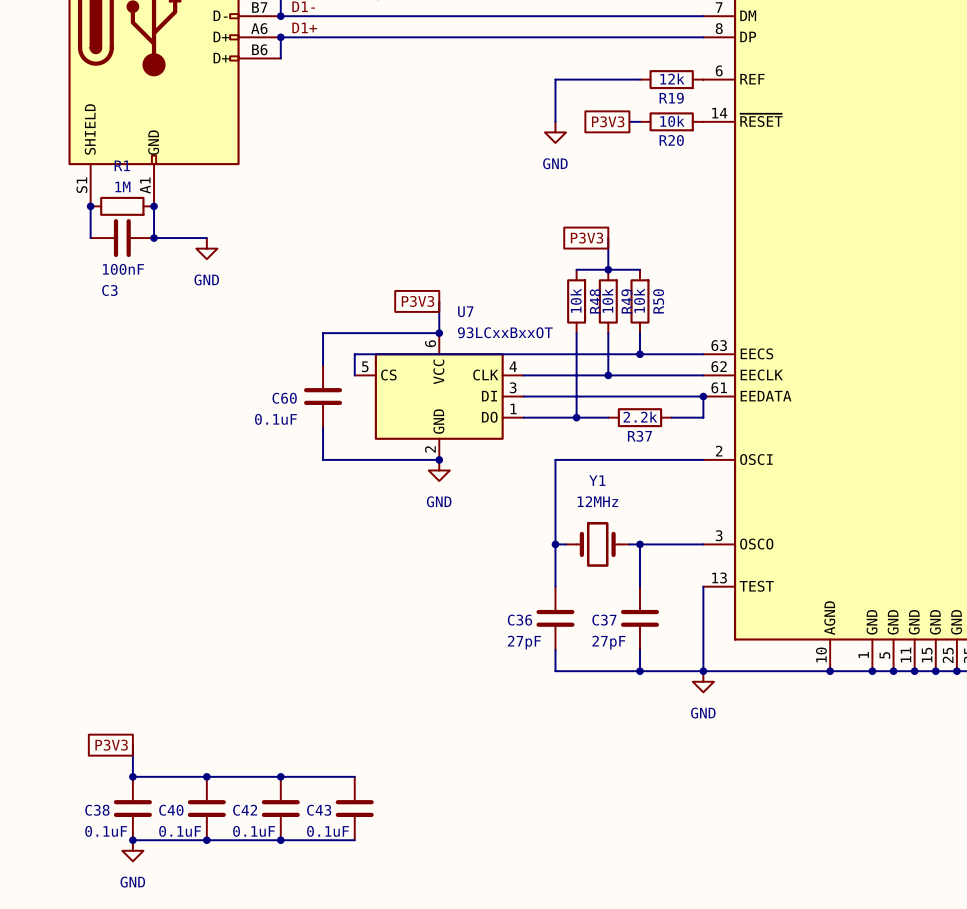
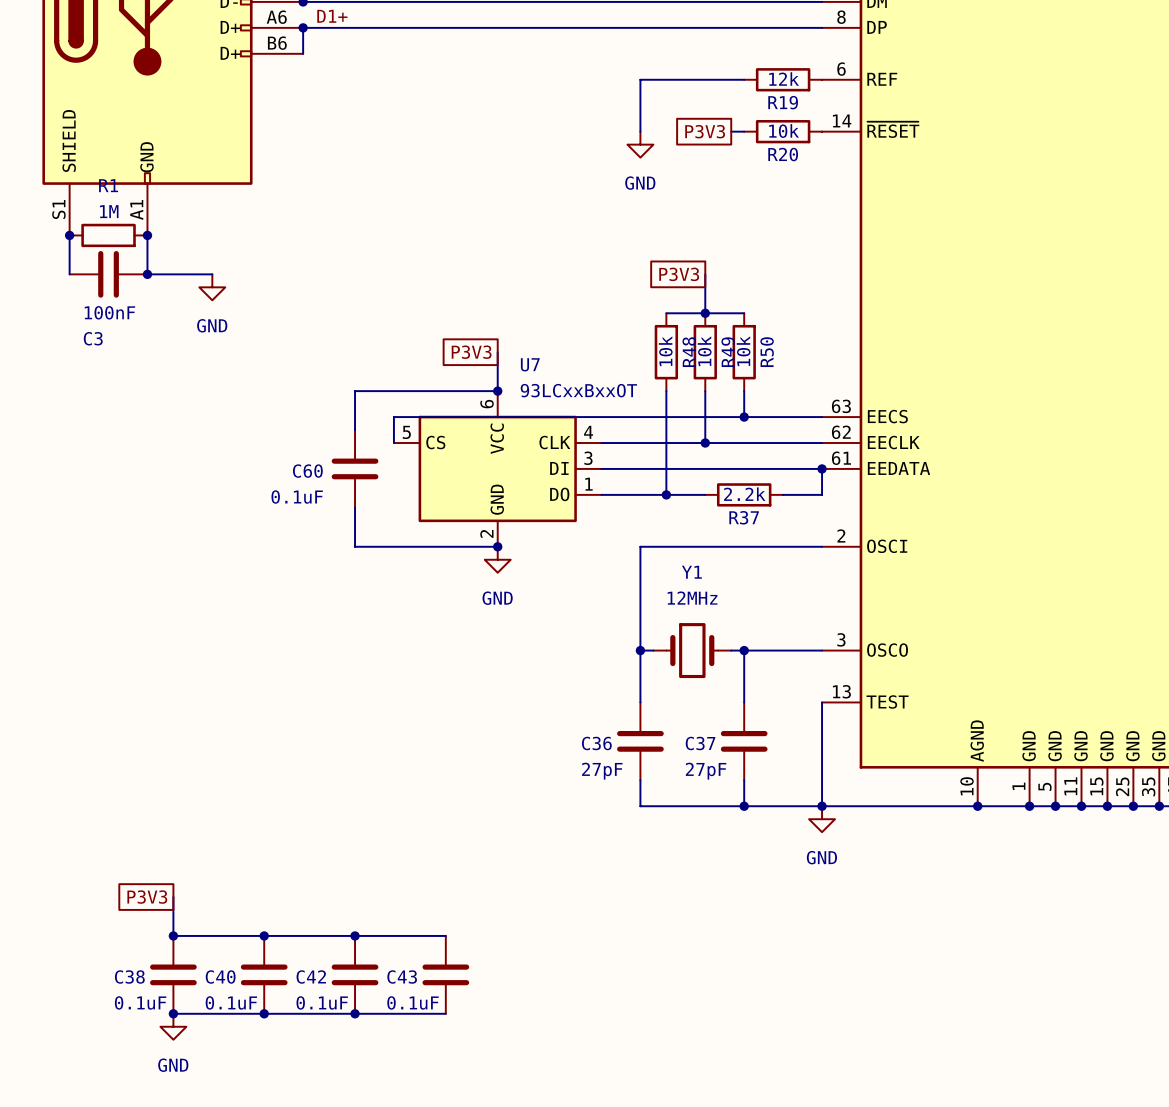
global label position: P3V3 (111, 745) -> P3V3 (147, 897)
wire: (132, 745) (132, 776) (175, 776) -> (173, 897) (173, 935)
junction: (132, 776) -> none
junction: none -> (173, 935)
junction: (206, 776) -> none
junction: none -> (264, 935)
junction: (280, 776) -> none
junction: none -> (355, 935)
wire: none -> (393, 935) (445, 935)
C38 position: (132, 808) -> (173, 974)
C40 position: (206, 808) -> (264, 974)
C42 position: (280, 808) -> (355, 974)
C43 position: (354, 808) -> (445, 974)
wire: (132, 840) (175, 840) -> none
junction: (132, 840) -> none
junction: none -> (173, 1013)
junction: (206, 840) -> none
junction: none -> (264, 1013)
junction: (280, 840) -> none
junction: none -> (355, 1013)
wire: none -> (393, 1013) (445, 1013)
power symbol position: GND (132, 850) -> GND (173, 1026)

